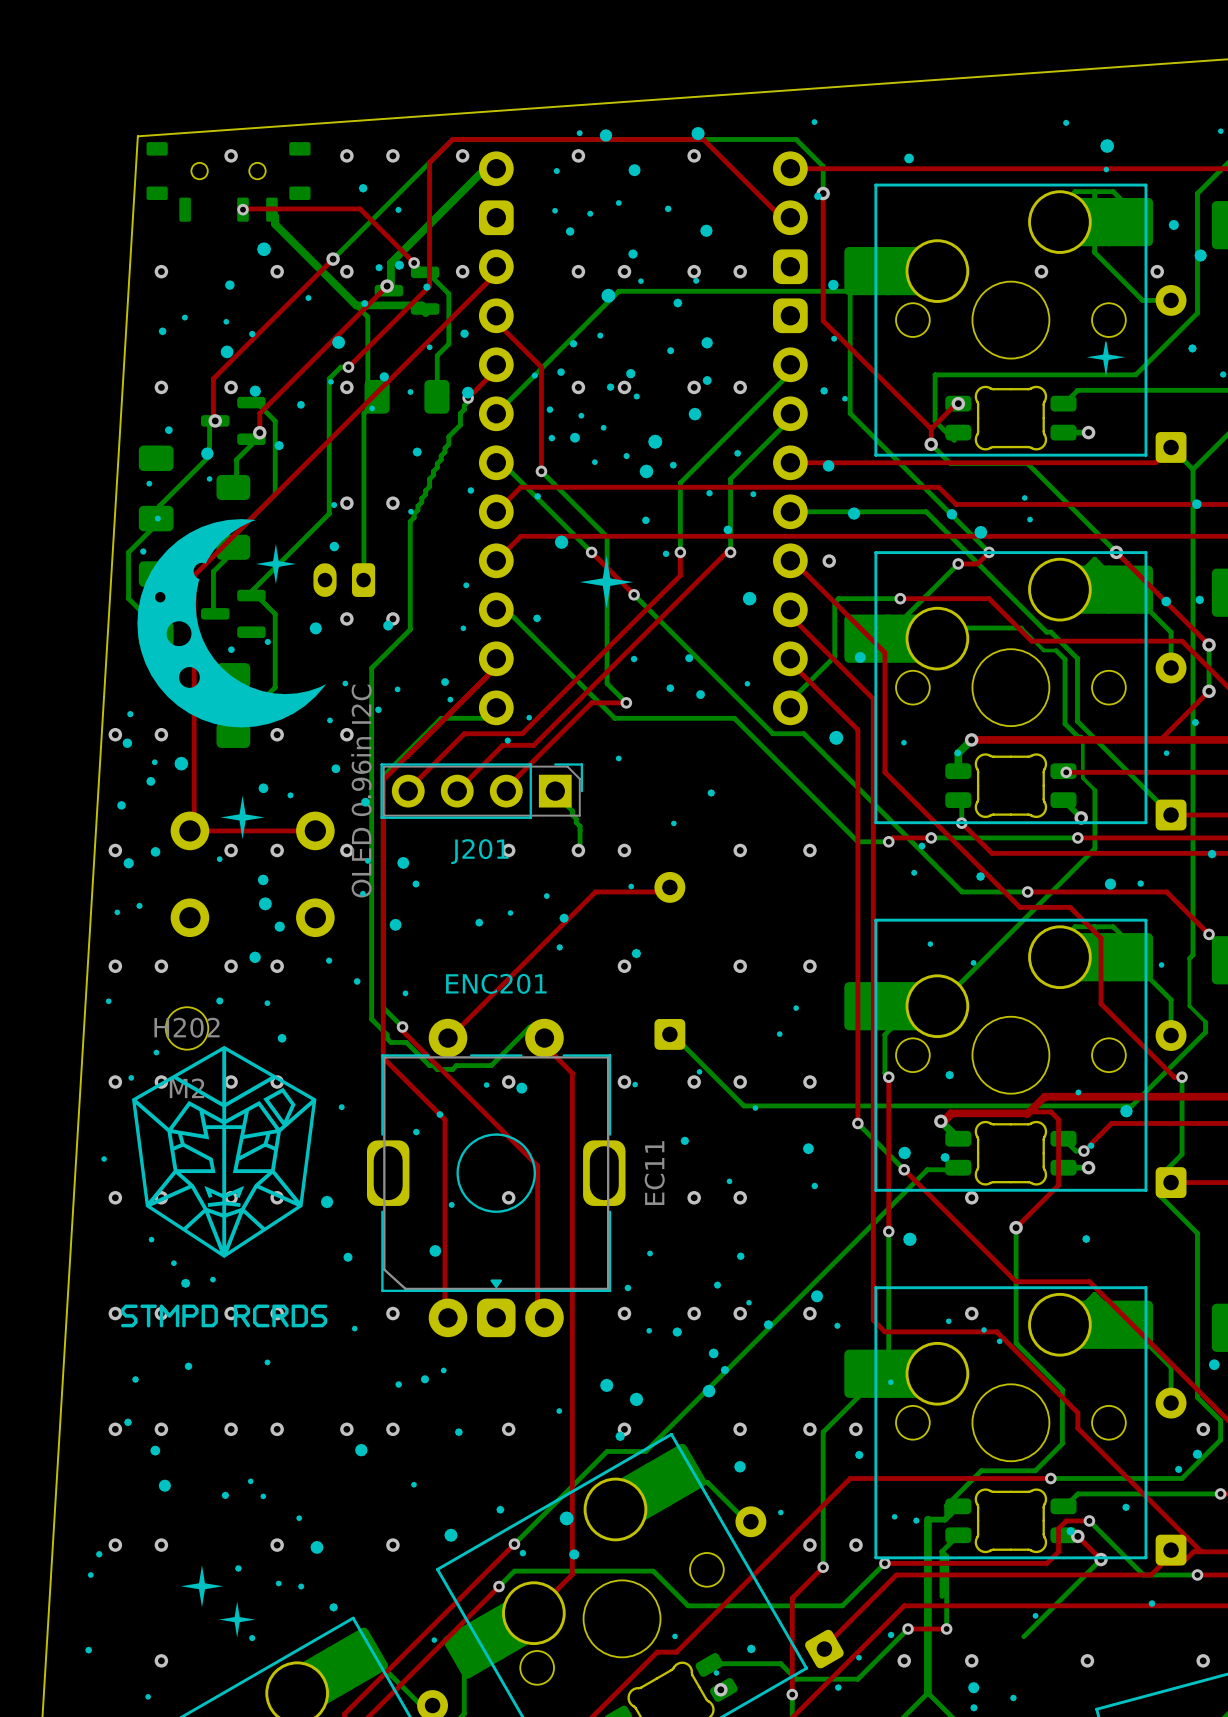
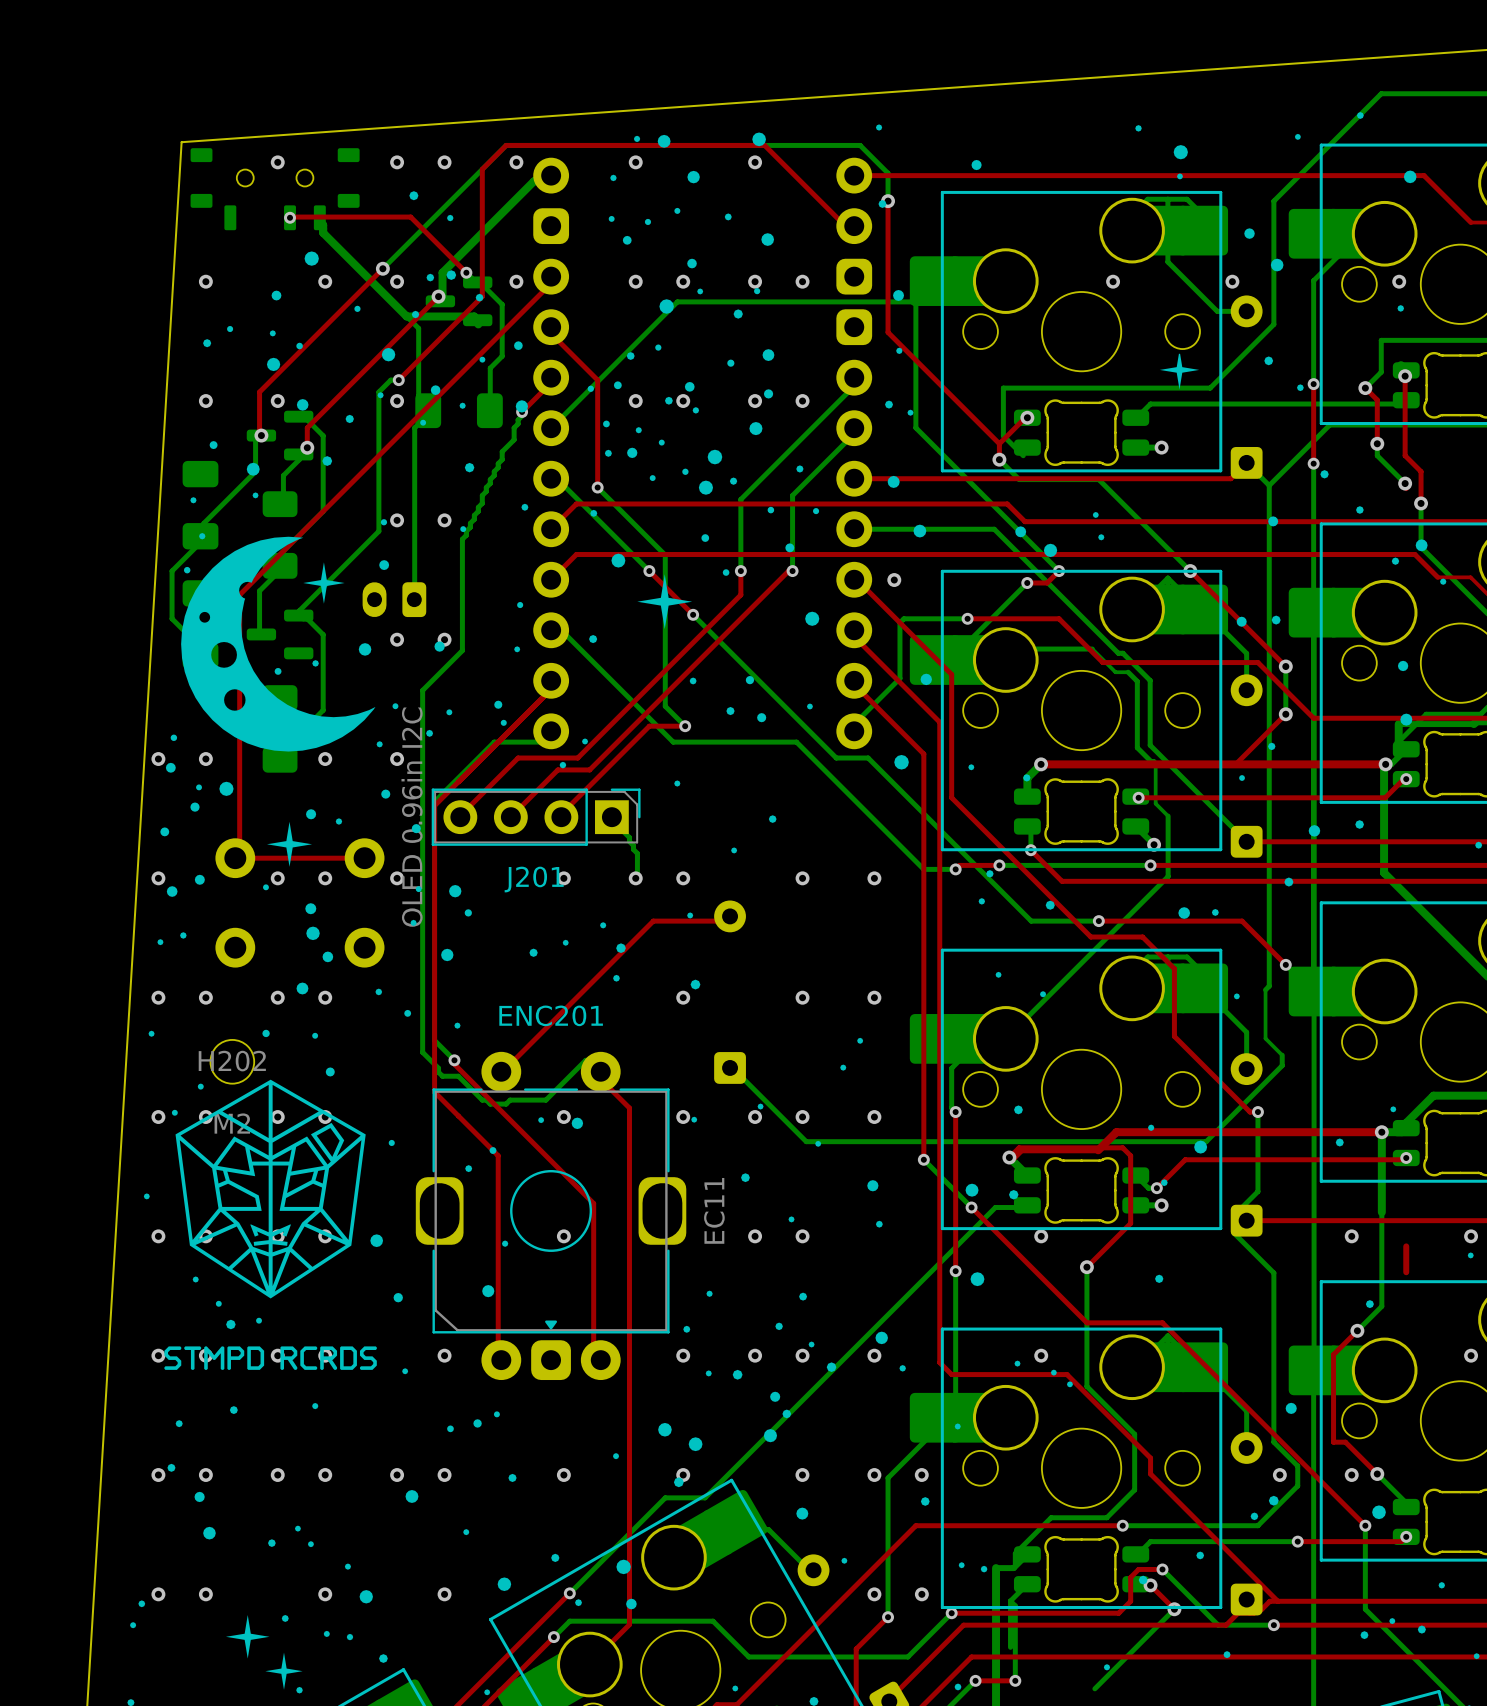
ENC201 footprint: [366, 1018, 626, 1338] -> [415, 1051, 687, 1381]

